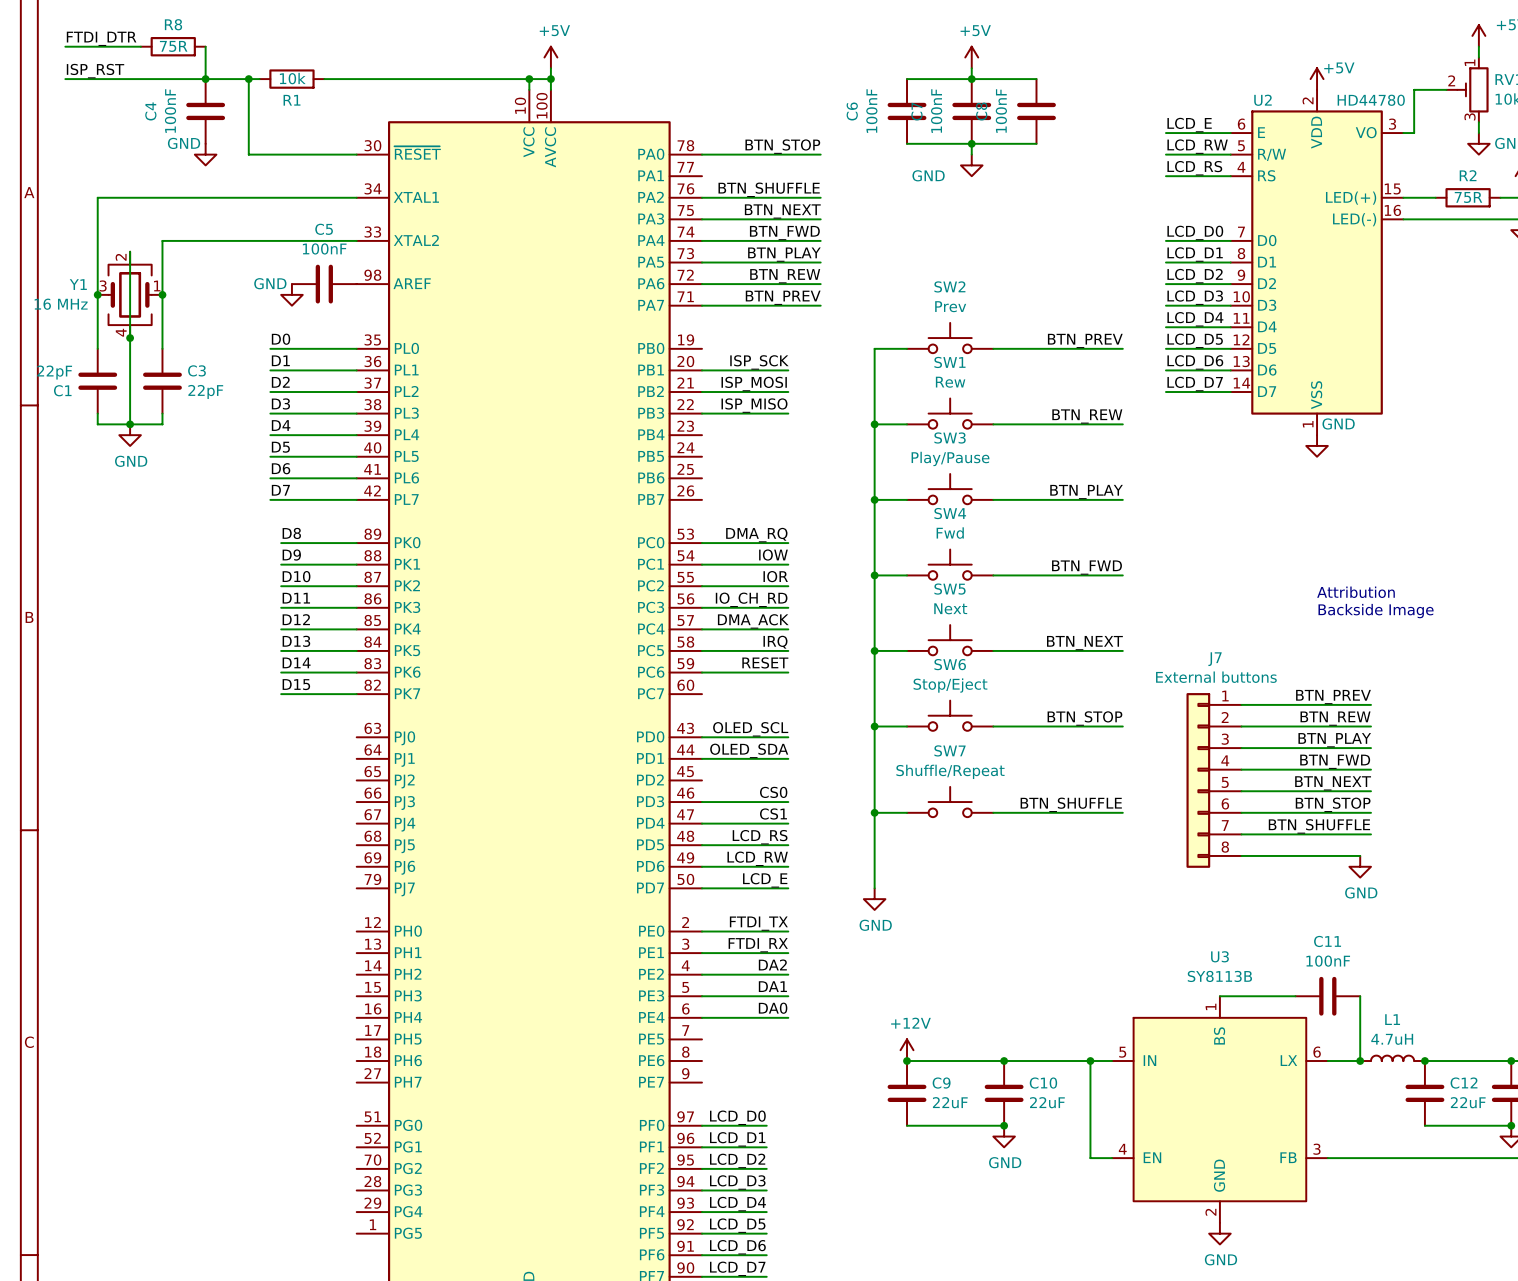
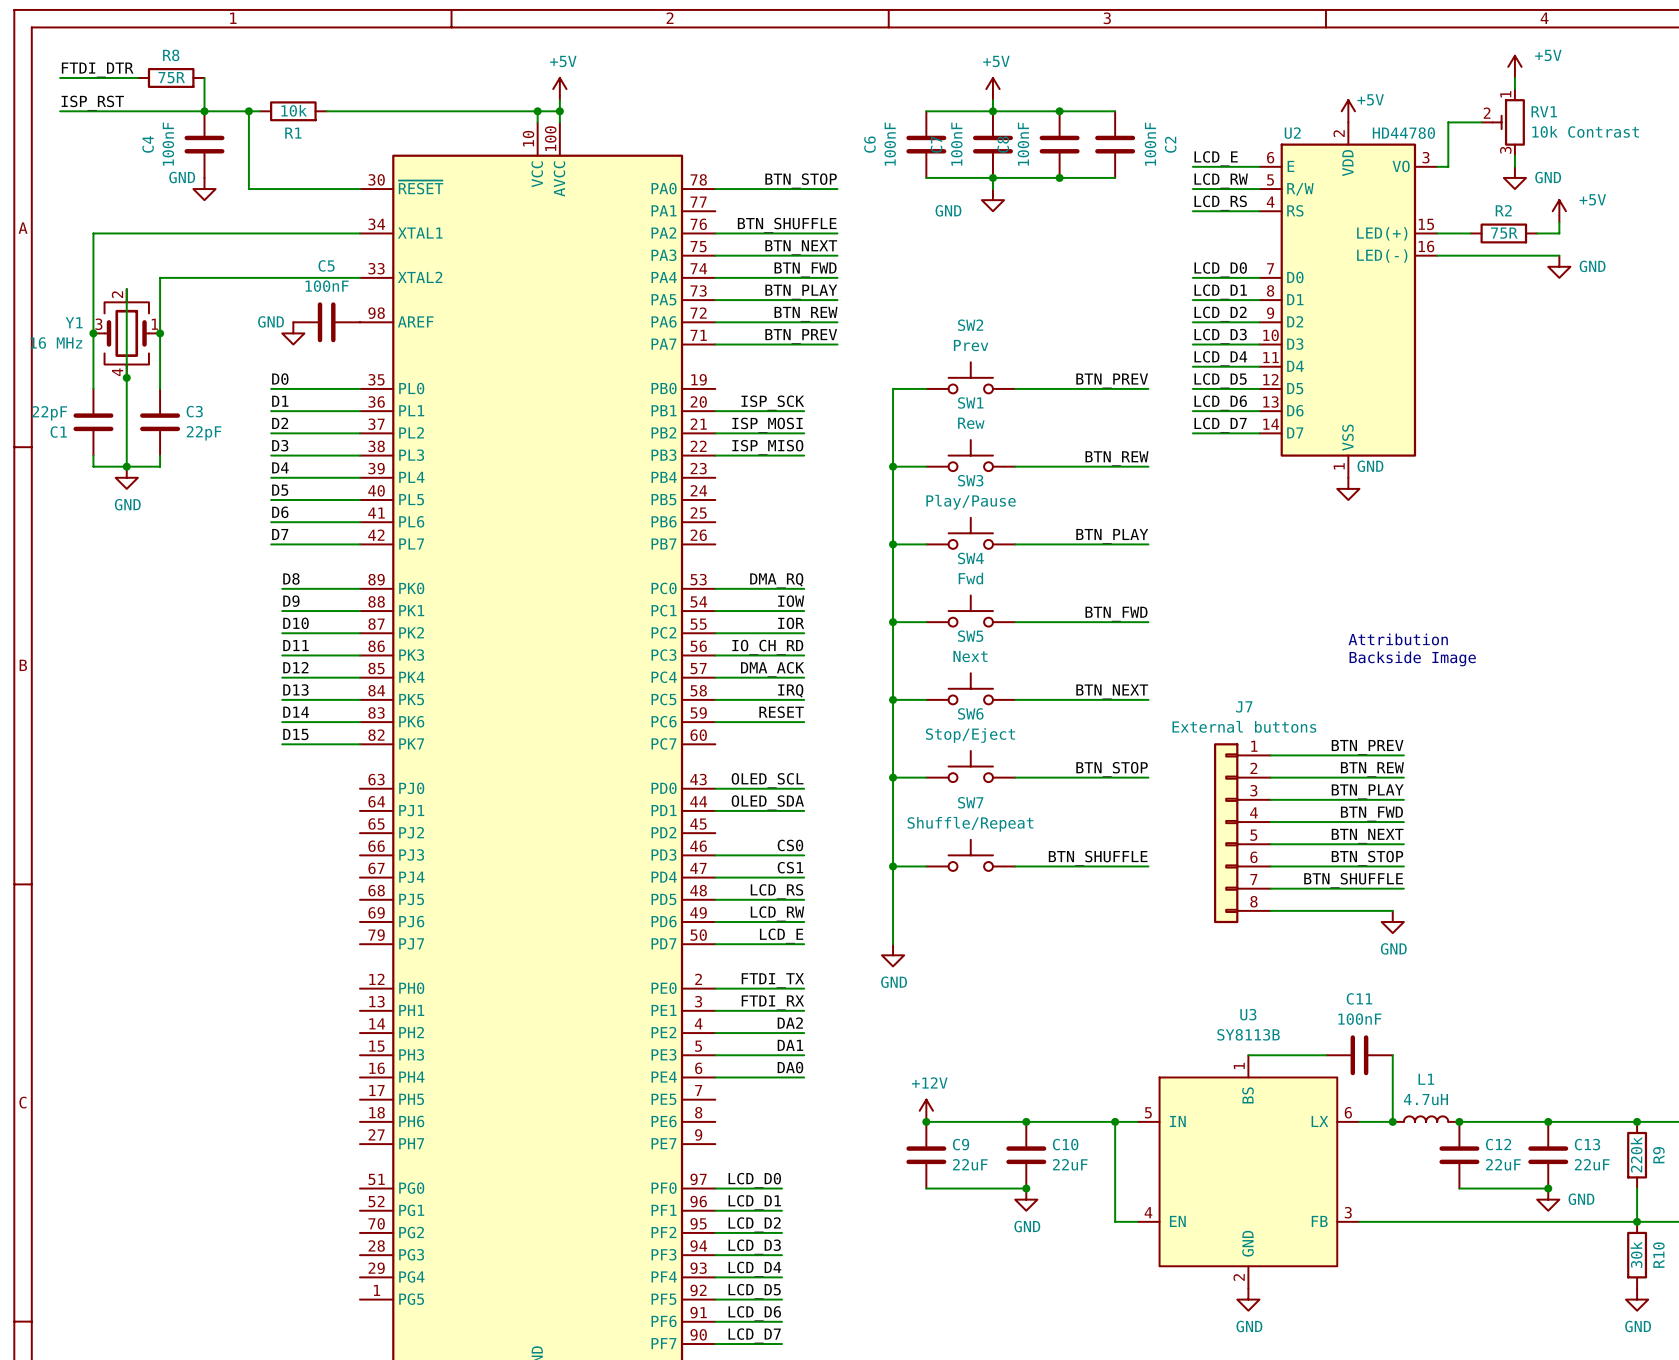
wire: none -> (1059, 111) (1115, 111)
junction: none -> (1059, 111)
C2: none -> 100nF (1115, 144)
wire: none -> (1059, 177) (1115, 177)
junction: none -> (1059, 177)

